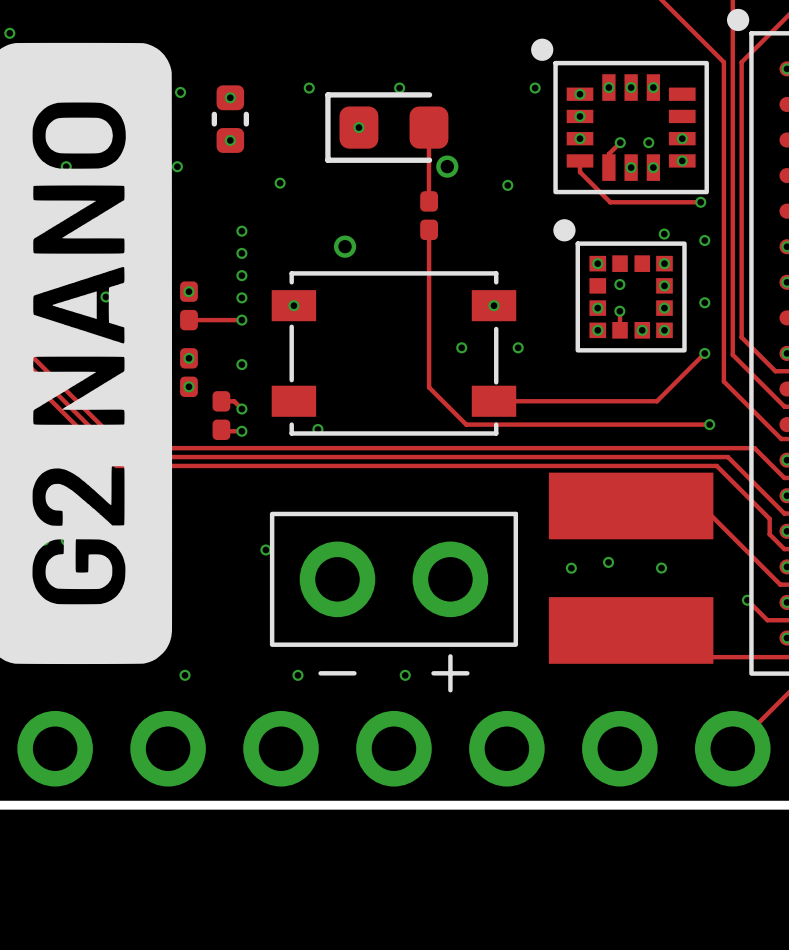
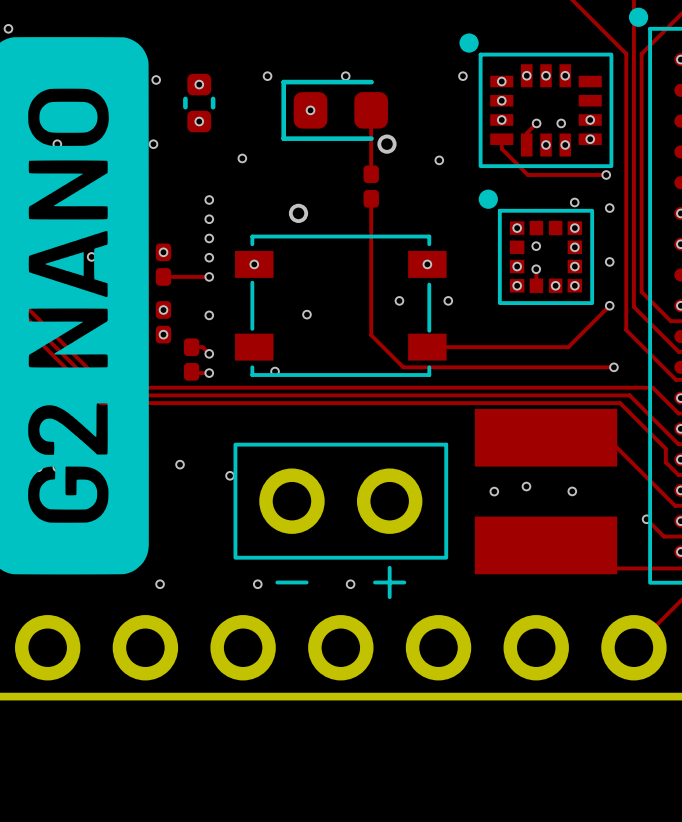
via: none -> (306, 314)
via: none -> (180, 464)

